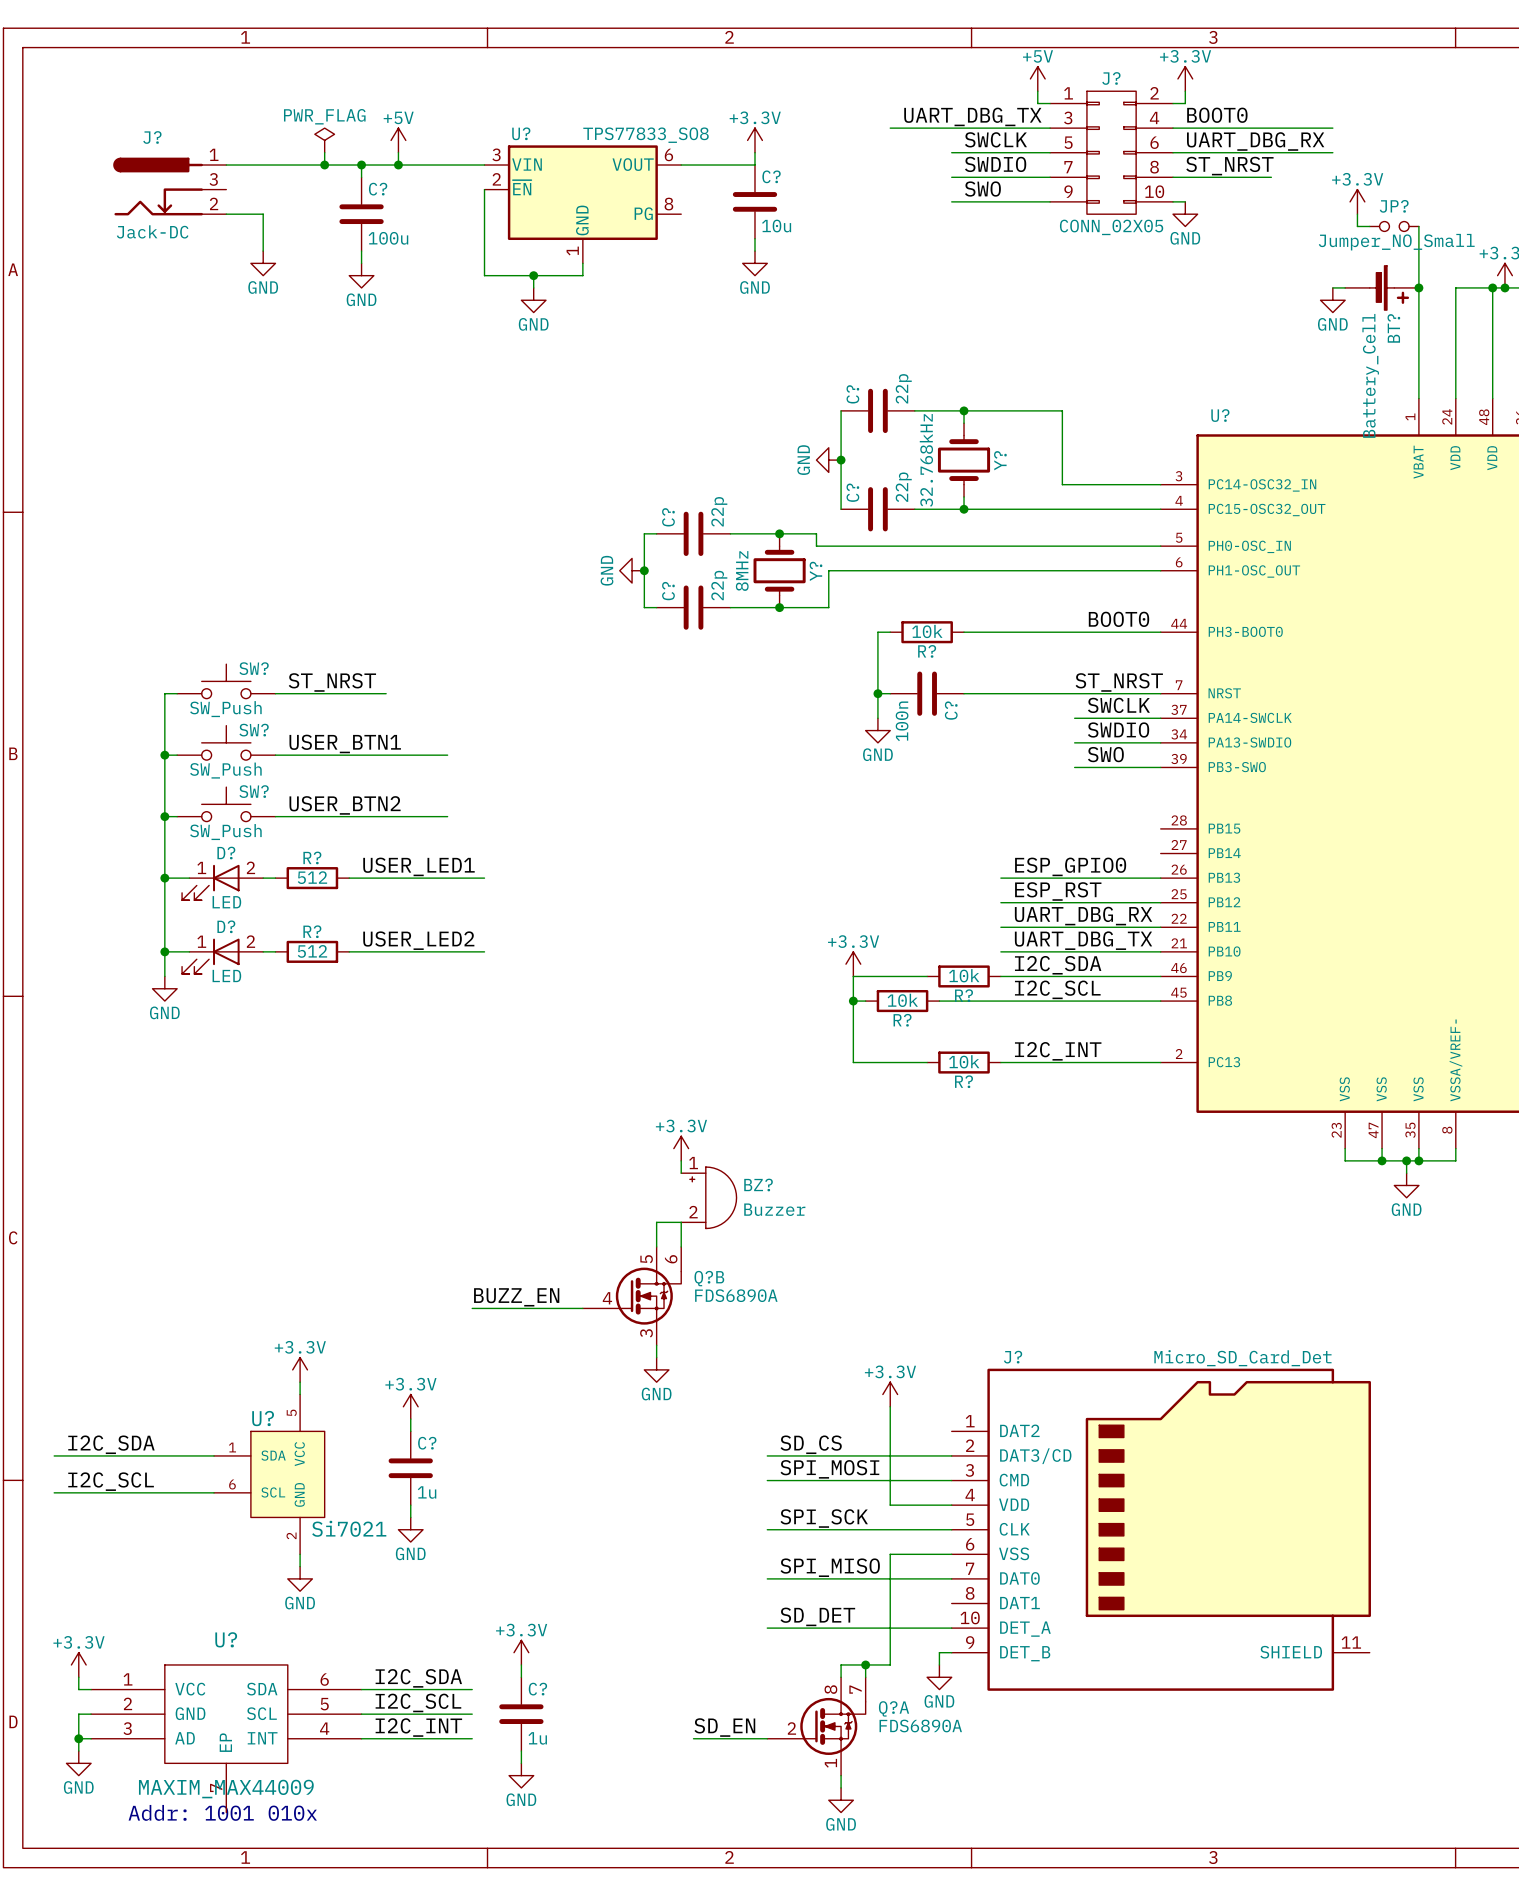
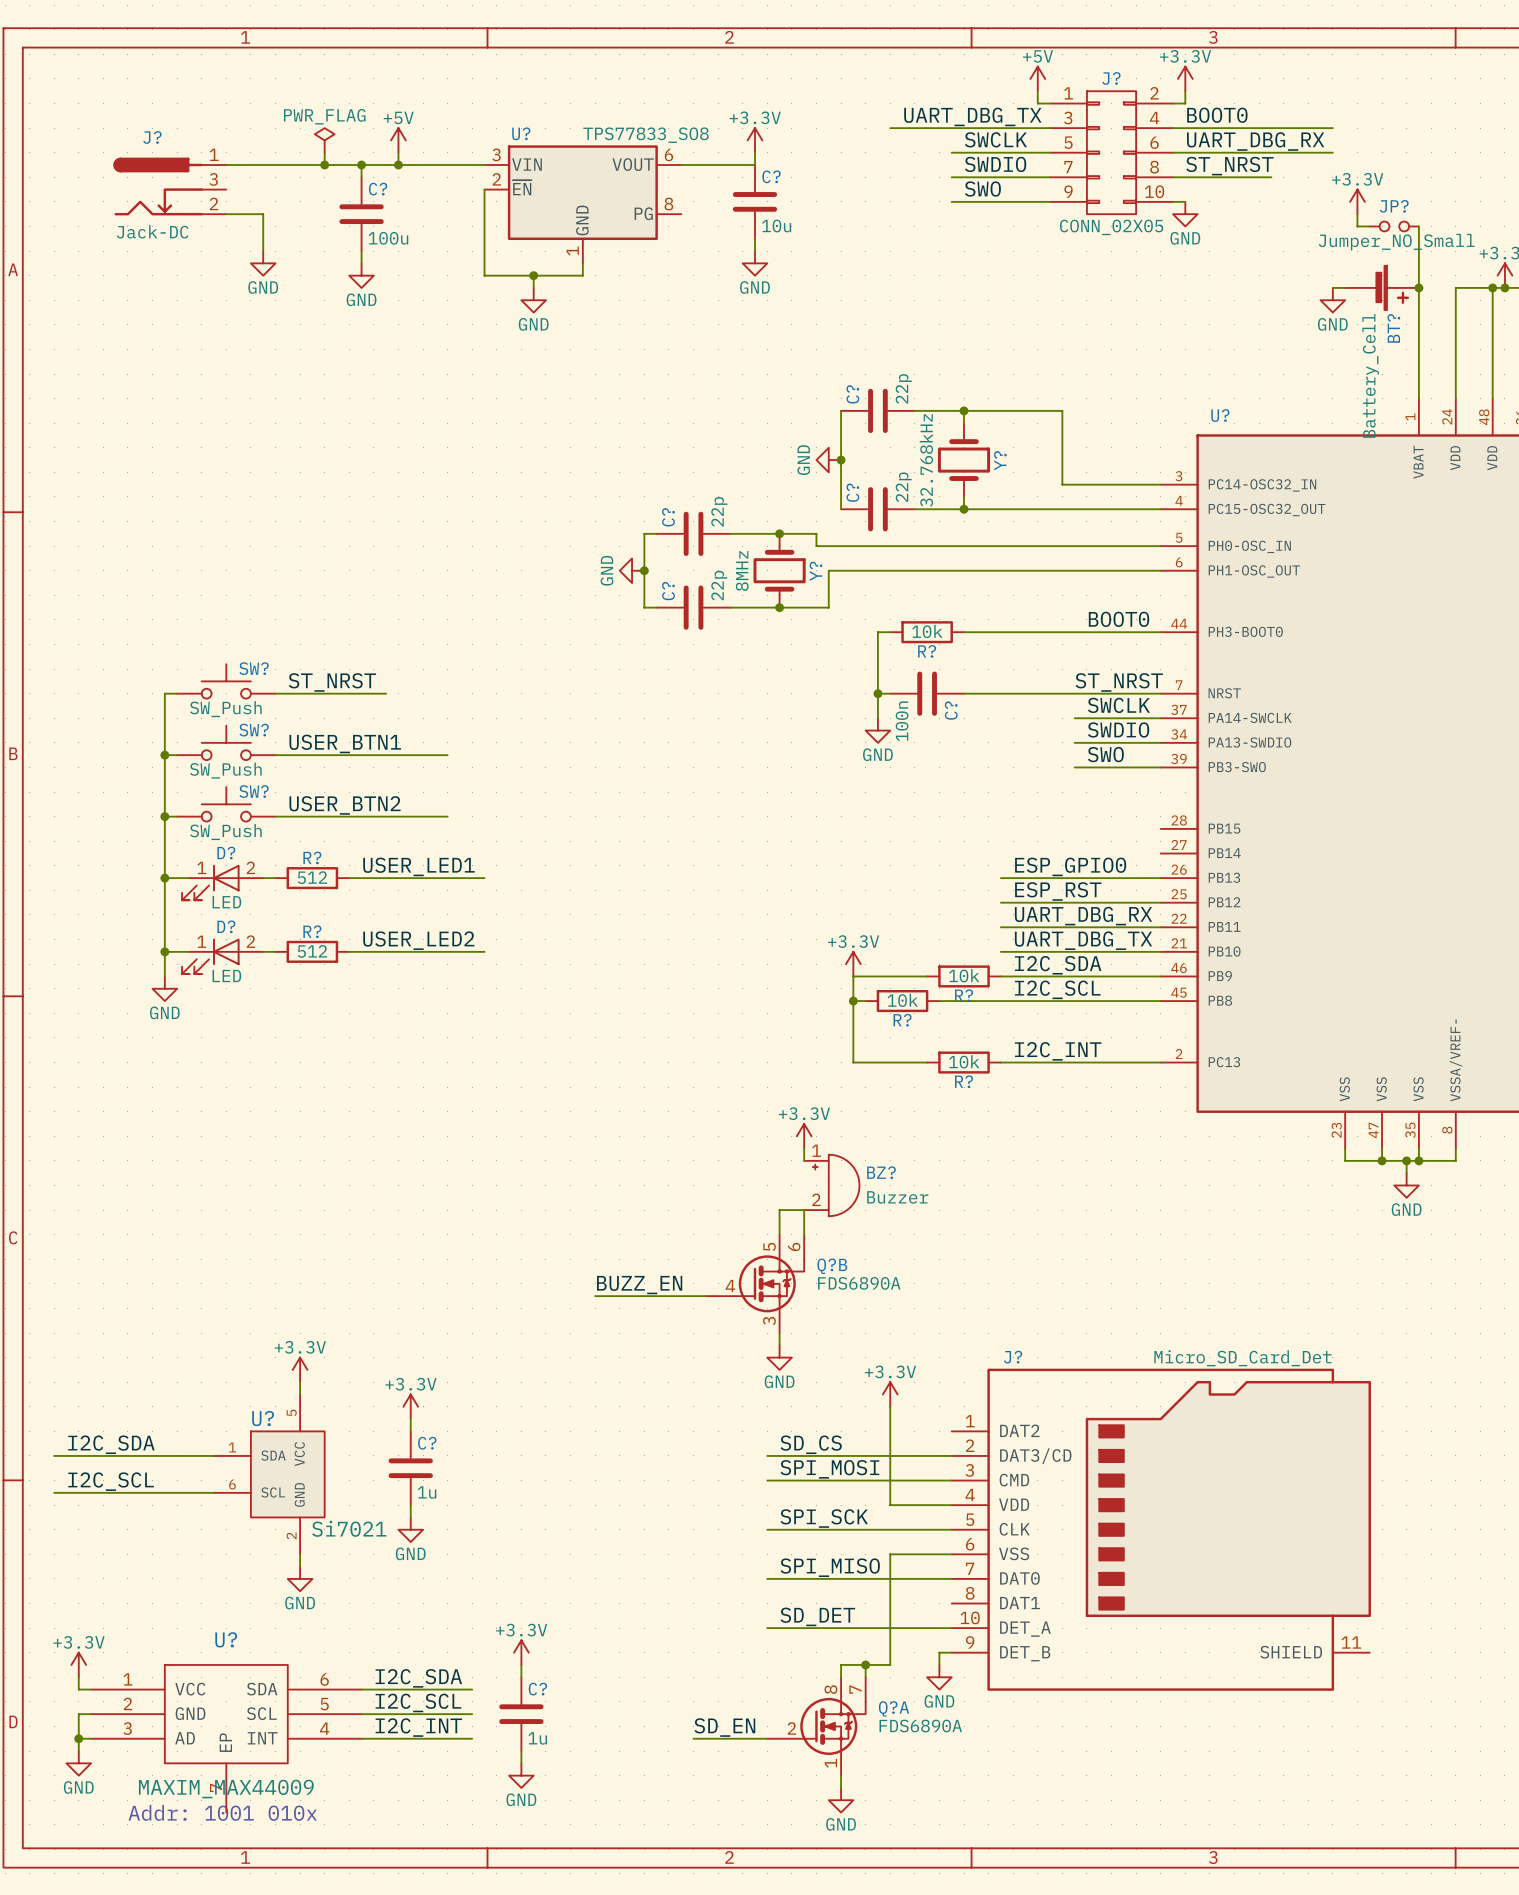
power symbol position: +3.3V (681, 1148) -> +3.3V (804, 1136)
wire: (681, 1160) (681, 1173) -> (804, 1148) (804, 1160)
BZ? position: (708, 1197) -> (831, 1185)
wire: (656, 1246) (656, 1222) (681, 1222) (681, 1246) -> (779, 1234) (779, 1210) (804, 1210) (804, 1234)
Q?B position: (632, 1296) -> (754, 1283)
label position: BUZZ_EN (516, 1297) -> BUZZ_EN (639, 1285)
wire: (472, 1308) (582, 1308) -> (595, 1296) (705, 1296)
wire: (656, 1345) (656, 1357) -> (779, 1333) (779, 1345)
power symbol position: GND (656, 1369) -> GND (779, 1357)

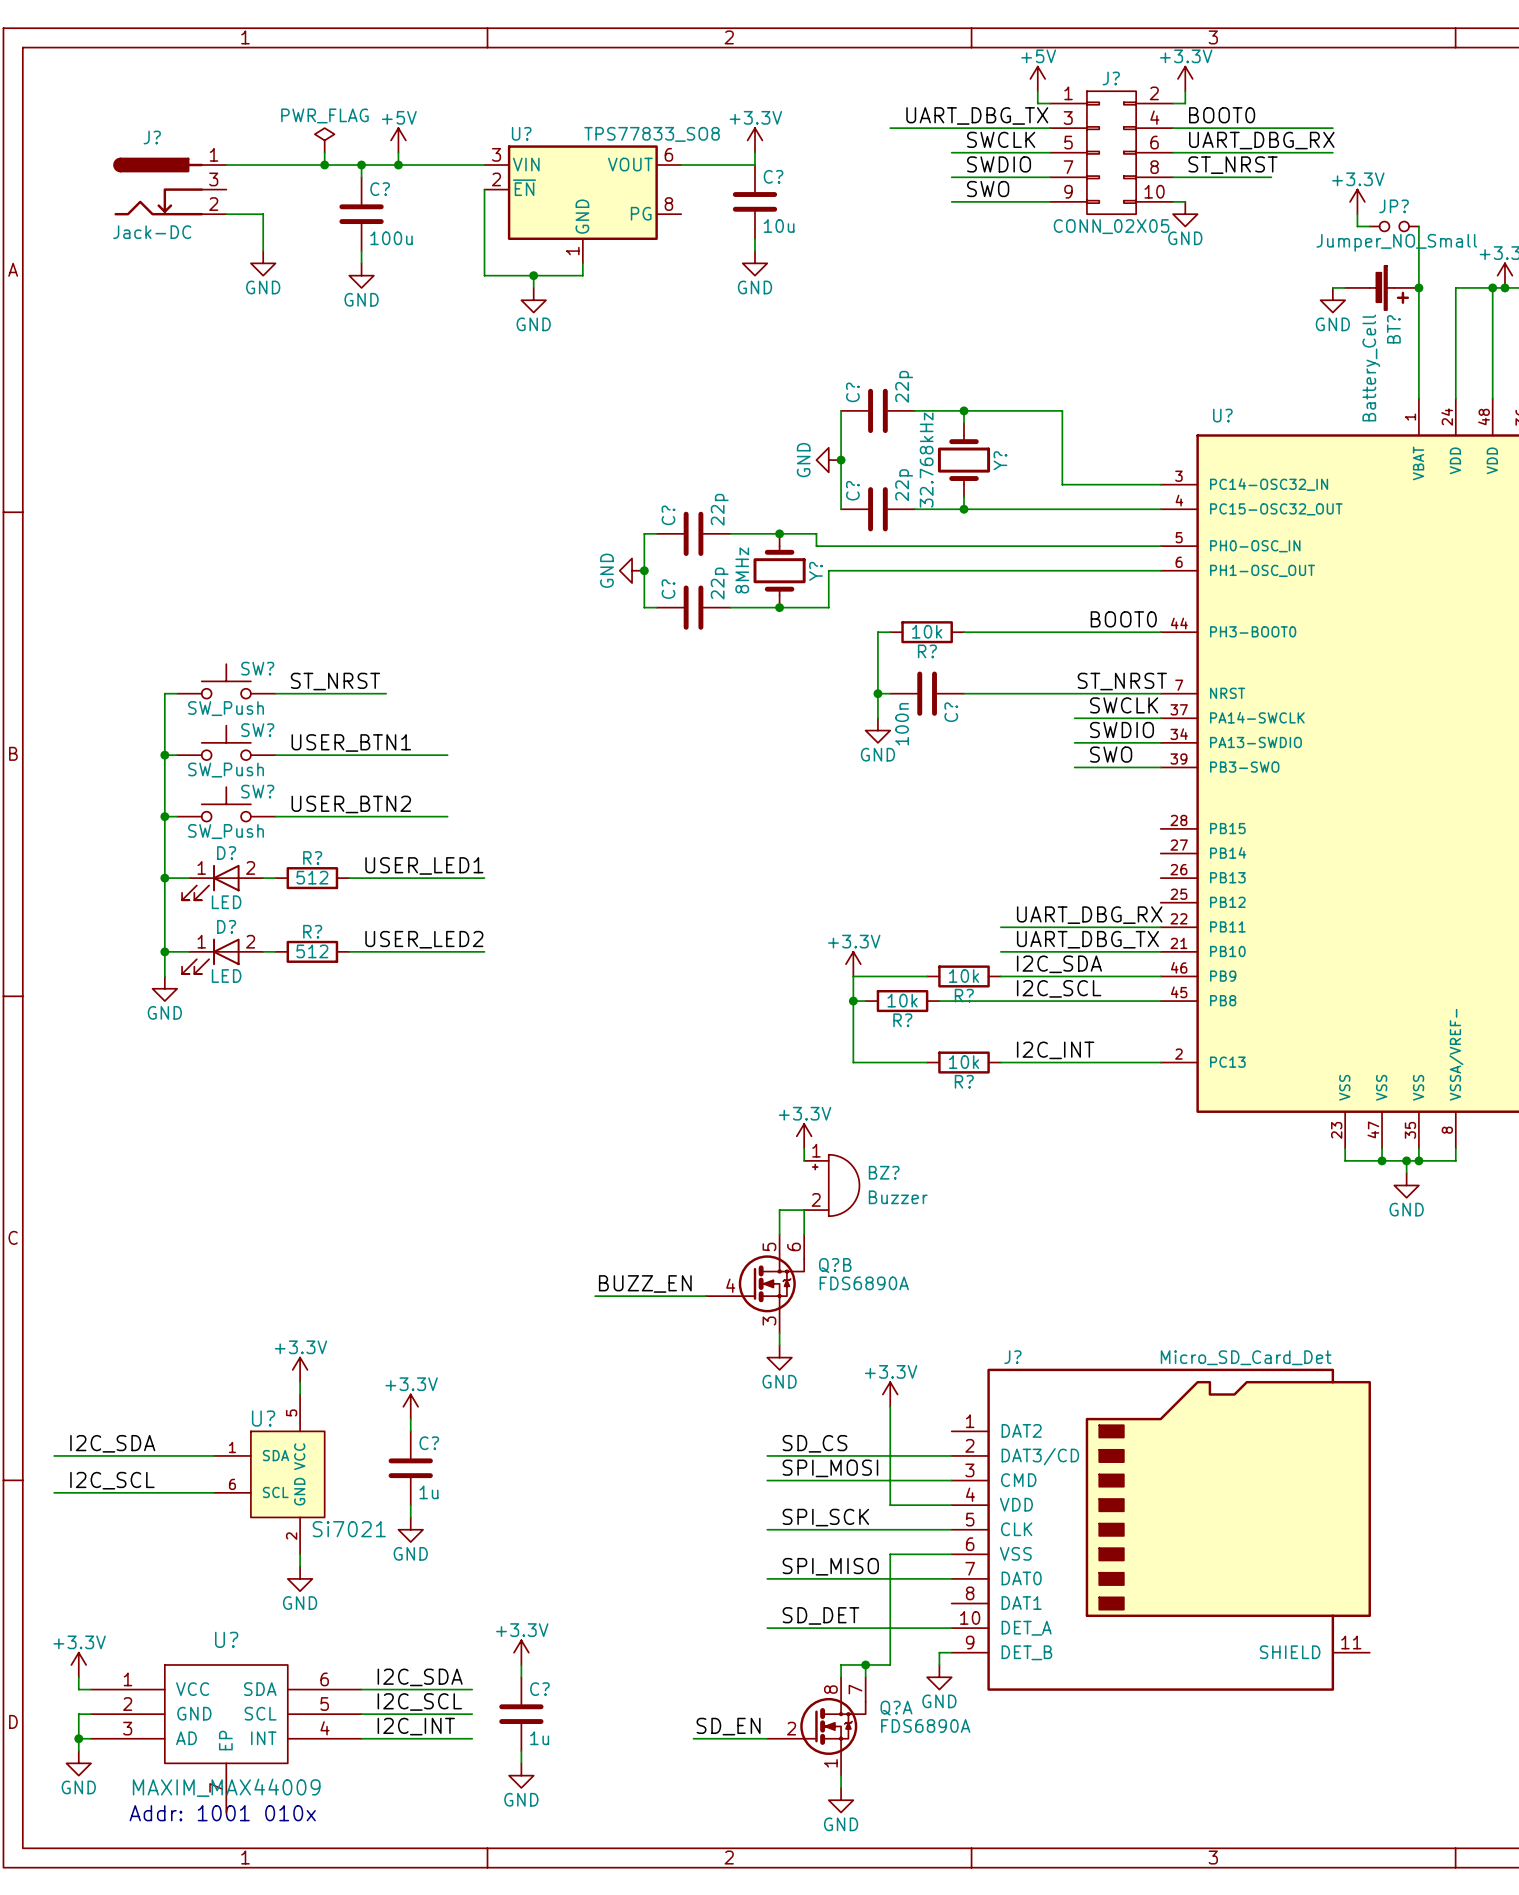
label: ESP_GPIO0 (1070, 866) -> none
wire: (1000, 878) (1160, 878) -> none
label: ESP_RST (1058, 891) -> none
wire: (1000, 902) (1160, 902) -> none

